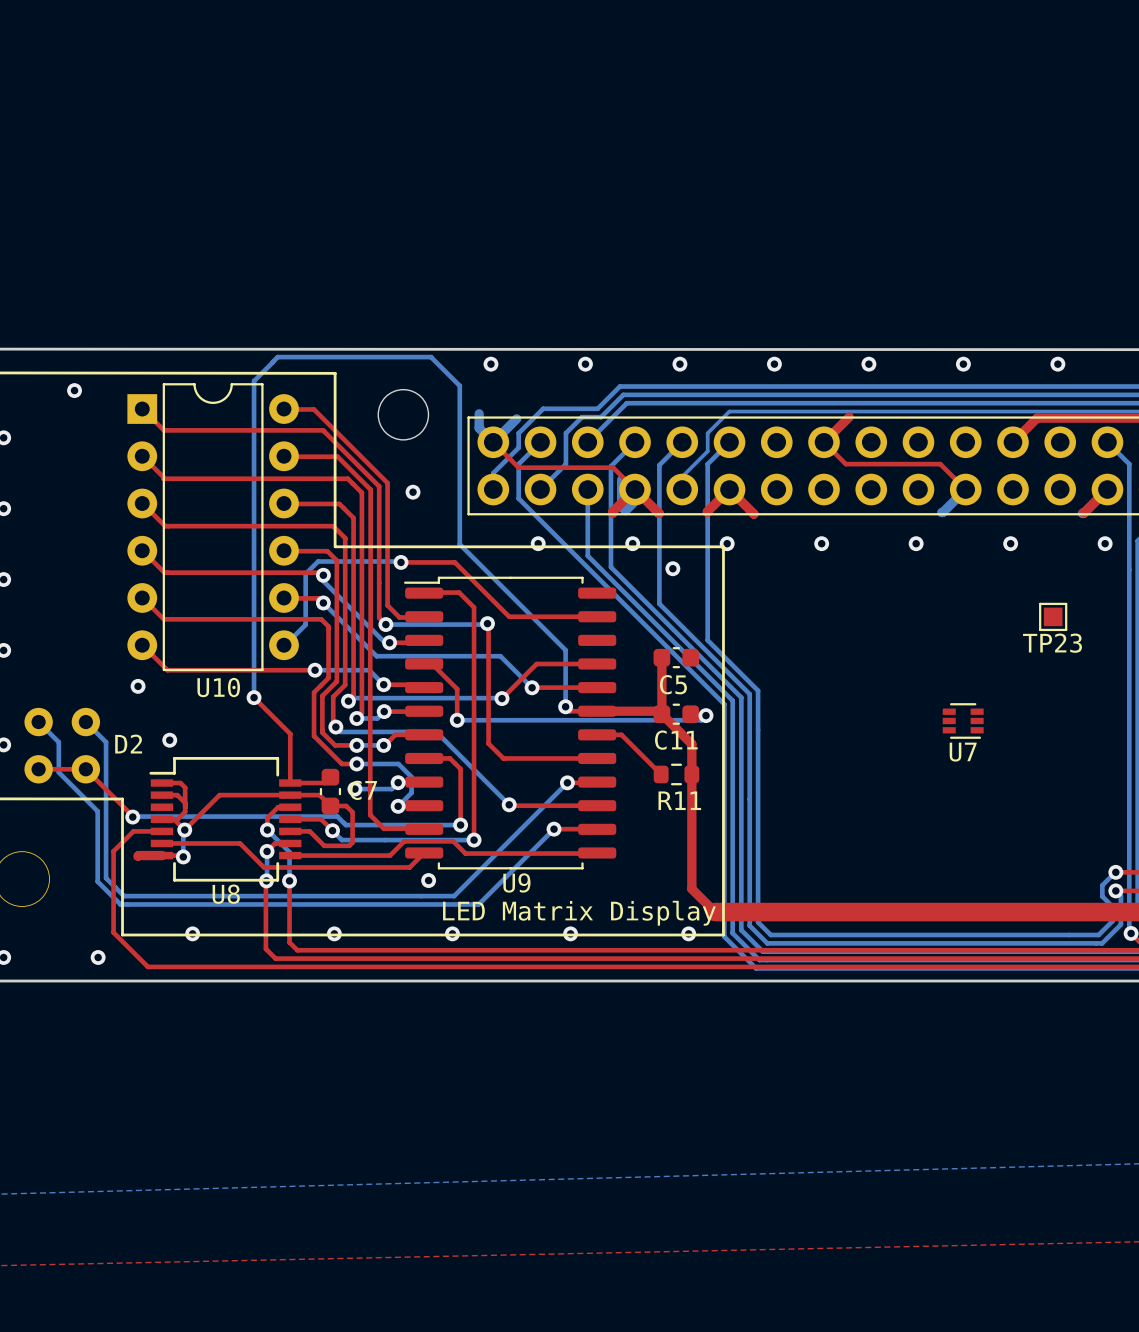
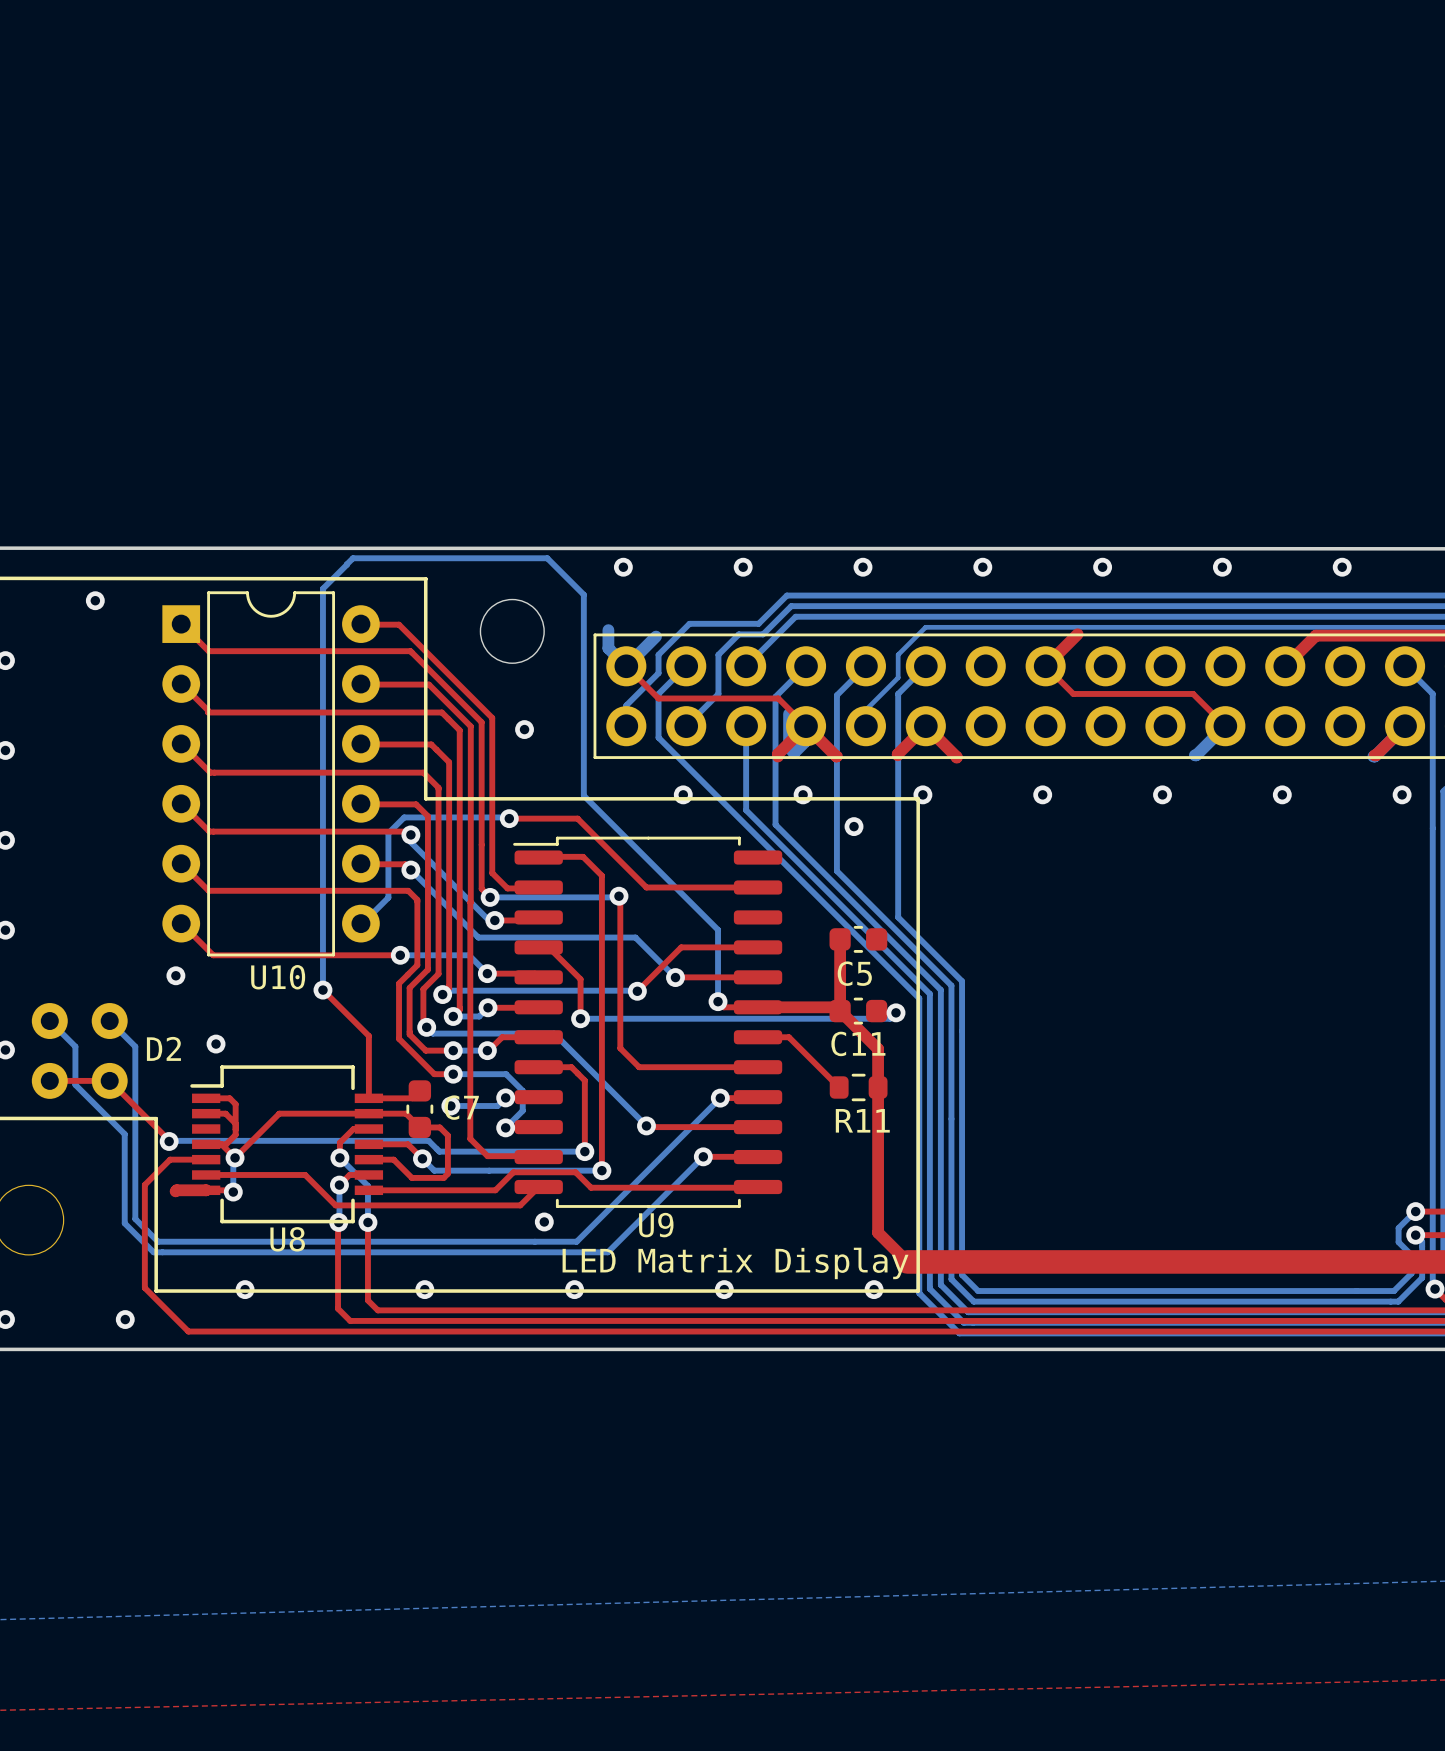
TP23: (1053, 616) -> none
U7: (963, 721) -> none

